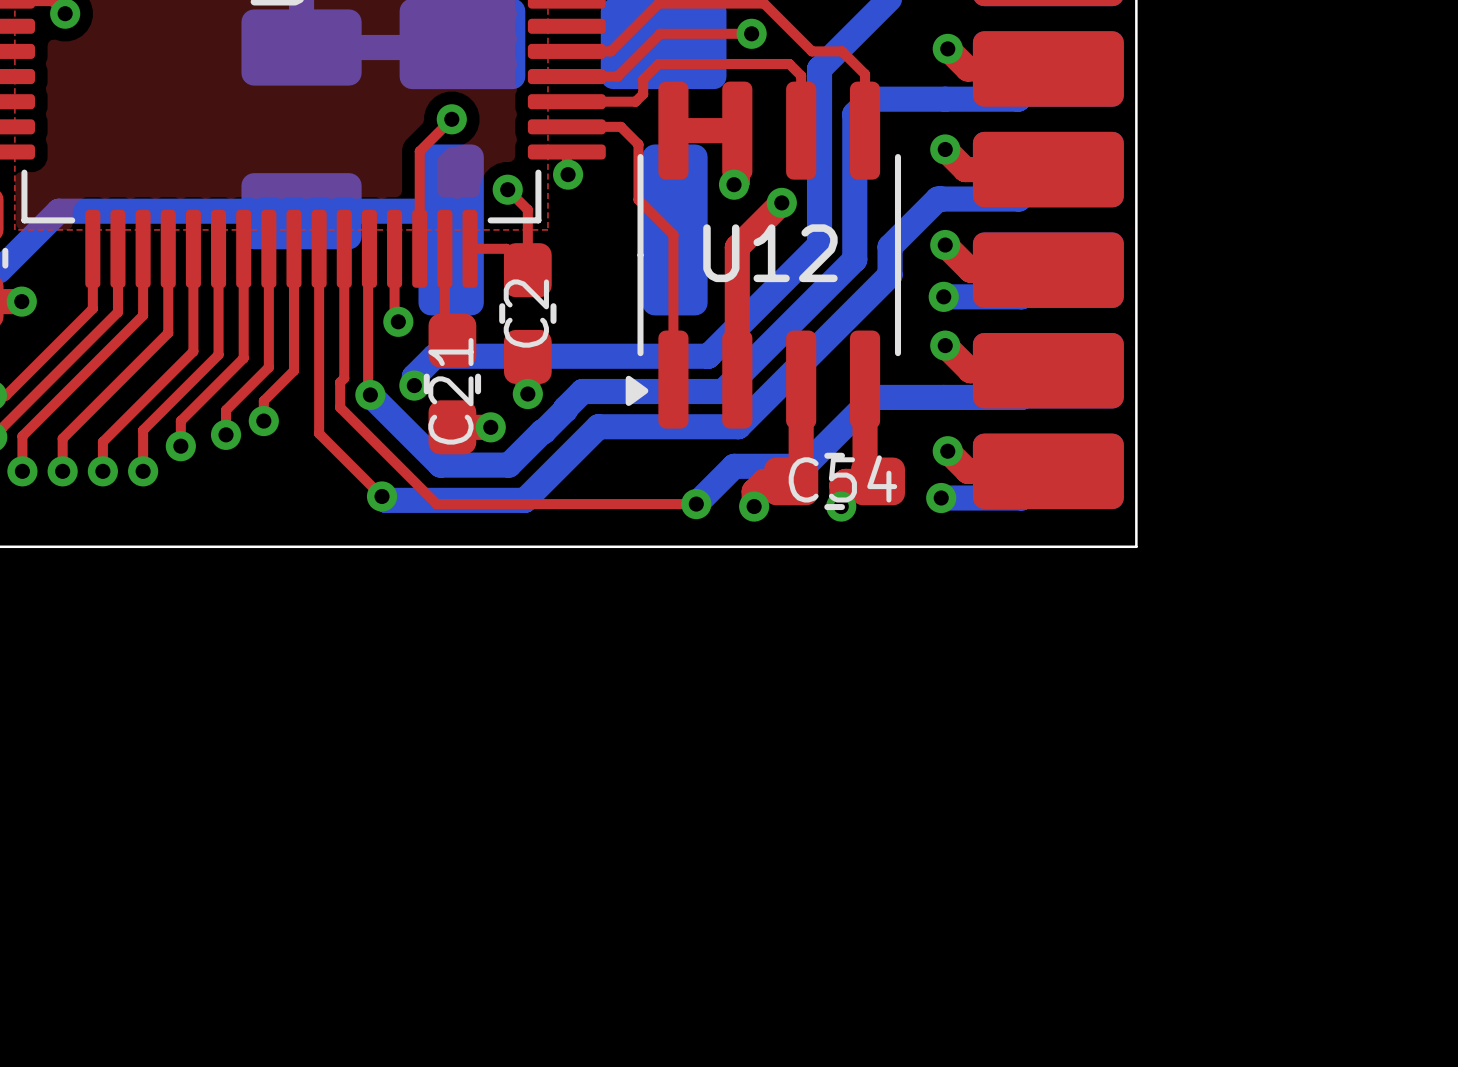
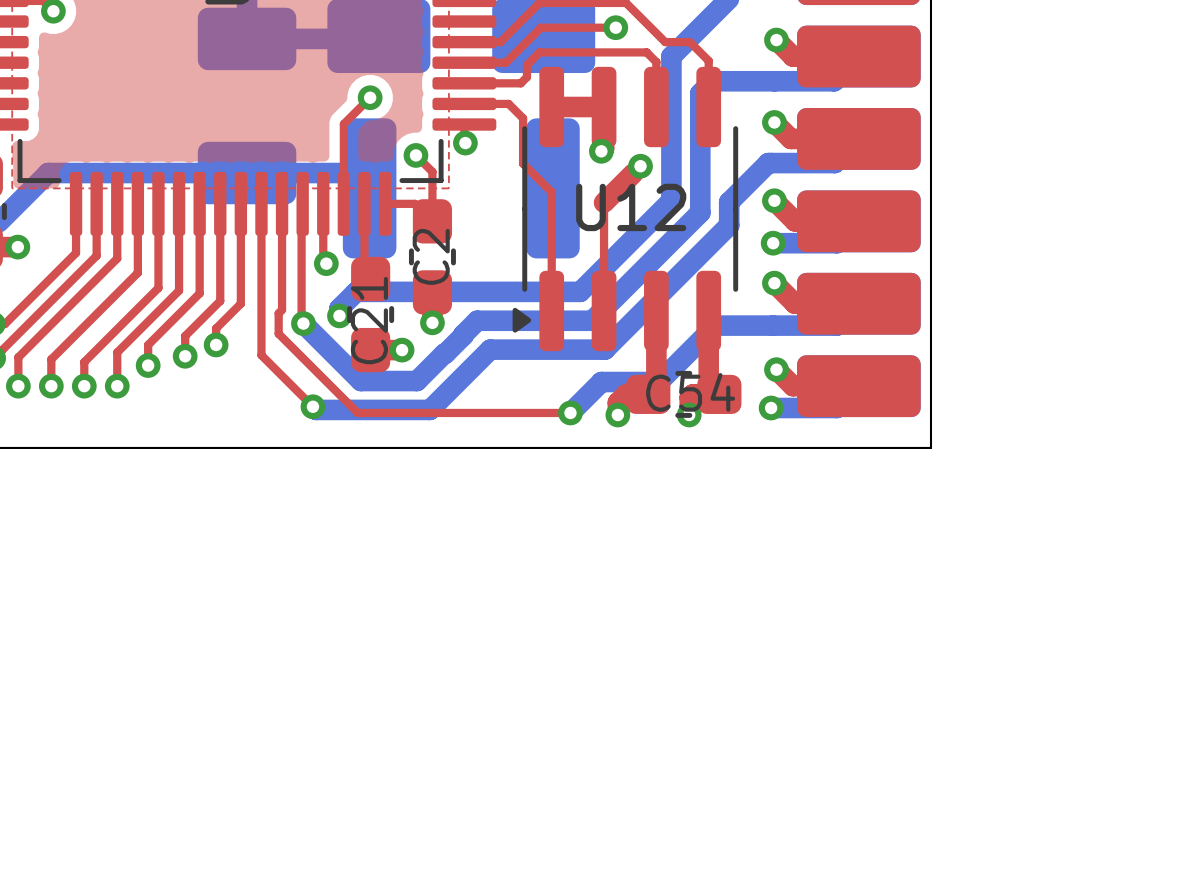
top track width: thick (737, 247) (737, 379) -> thin (604, 202) (604, 310)

